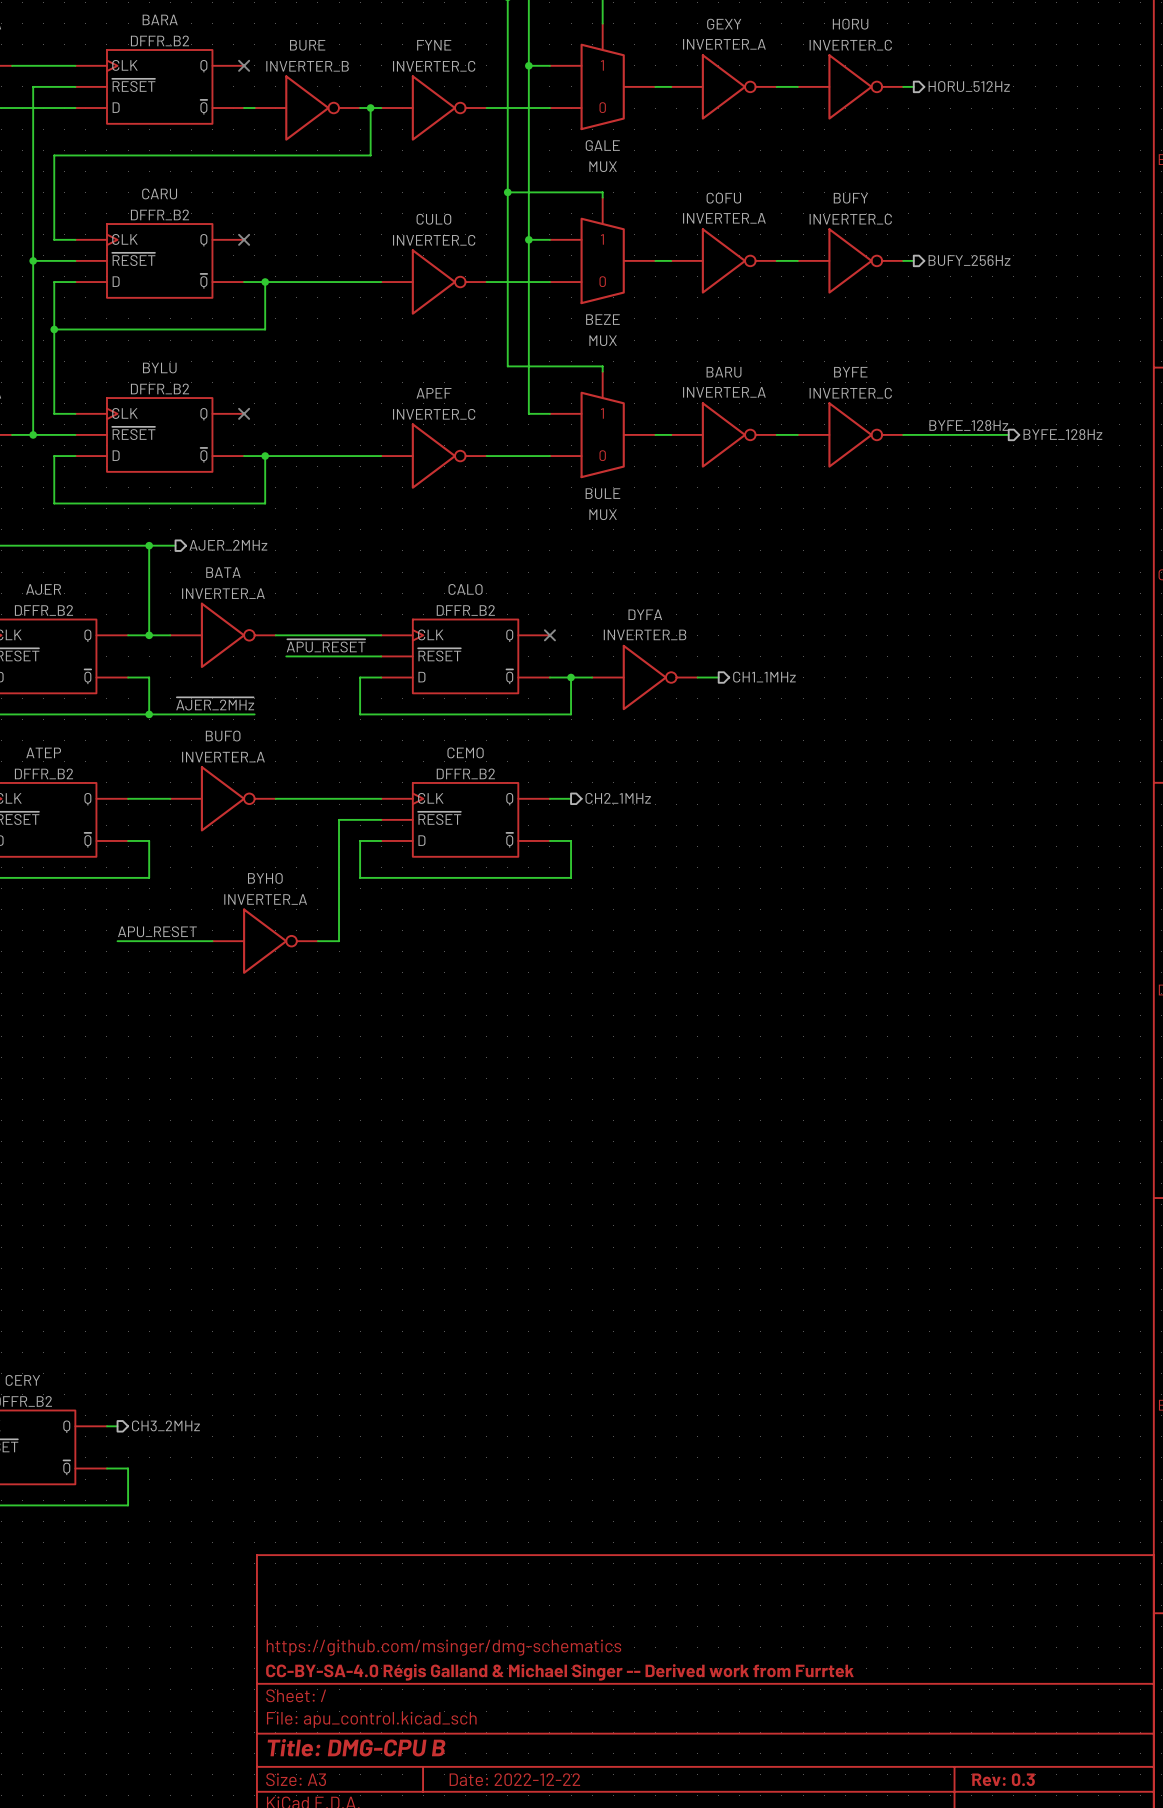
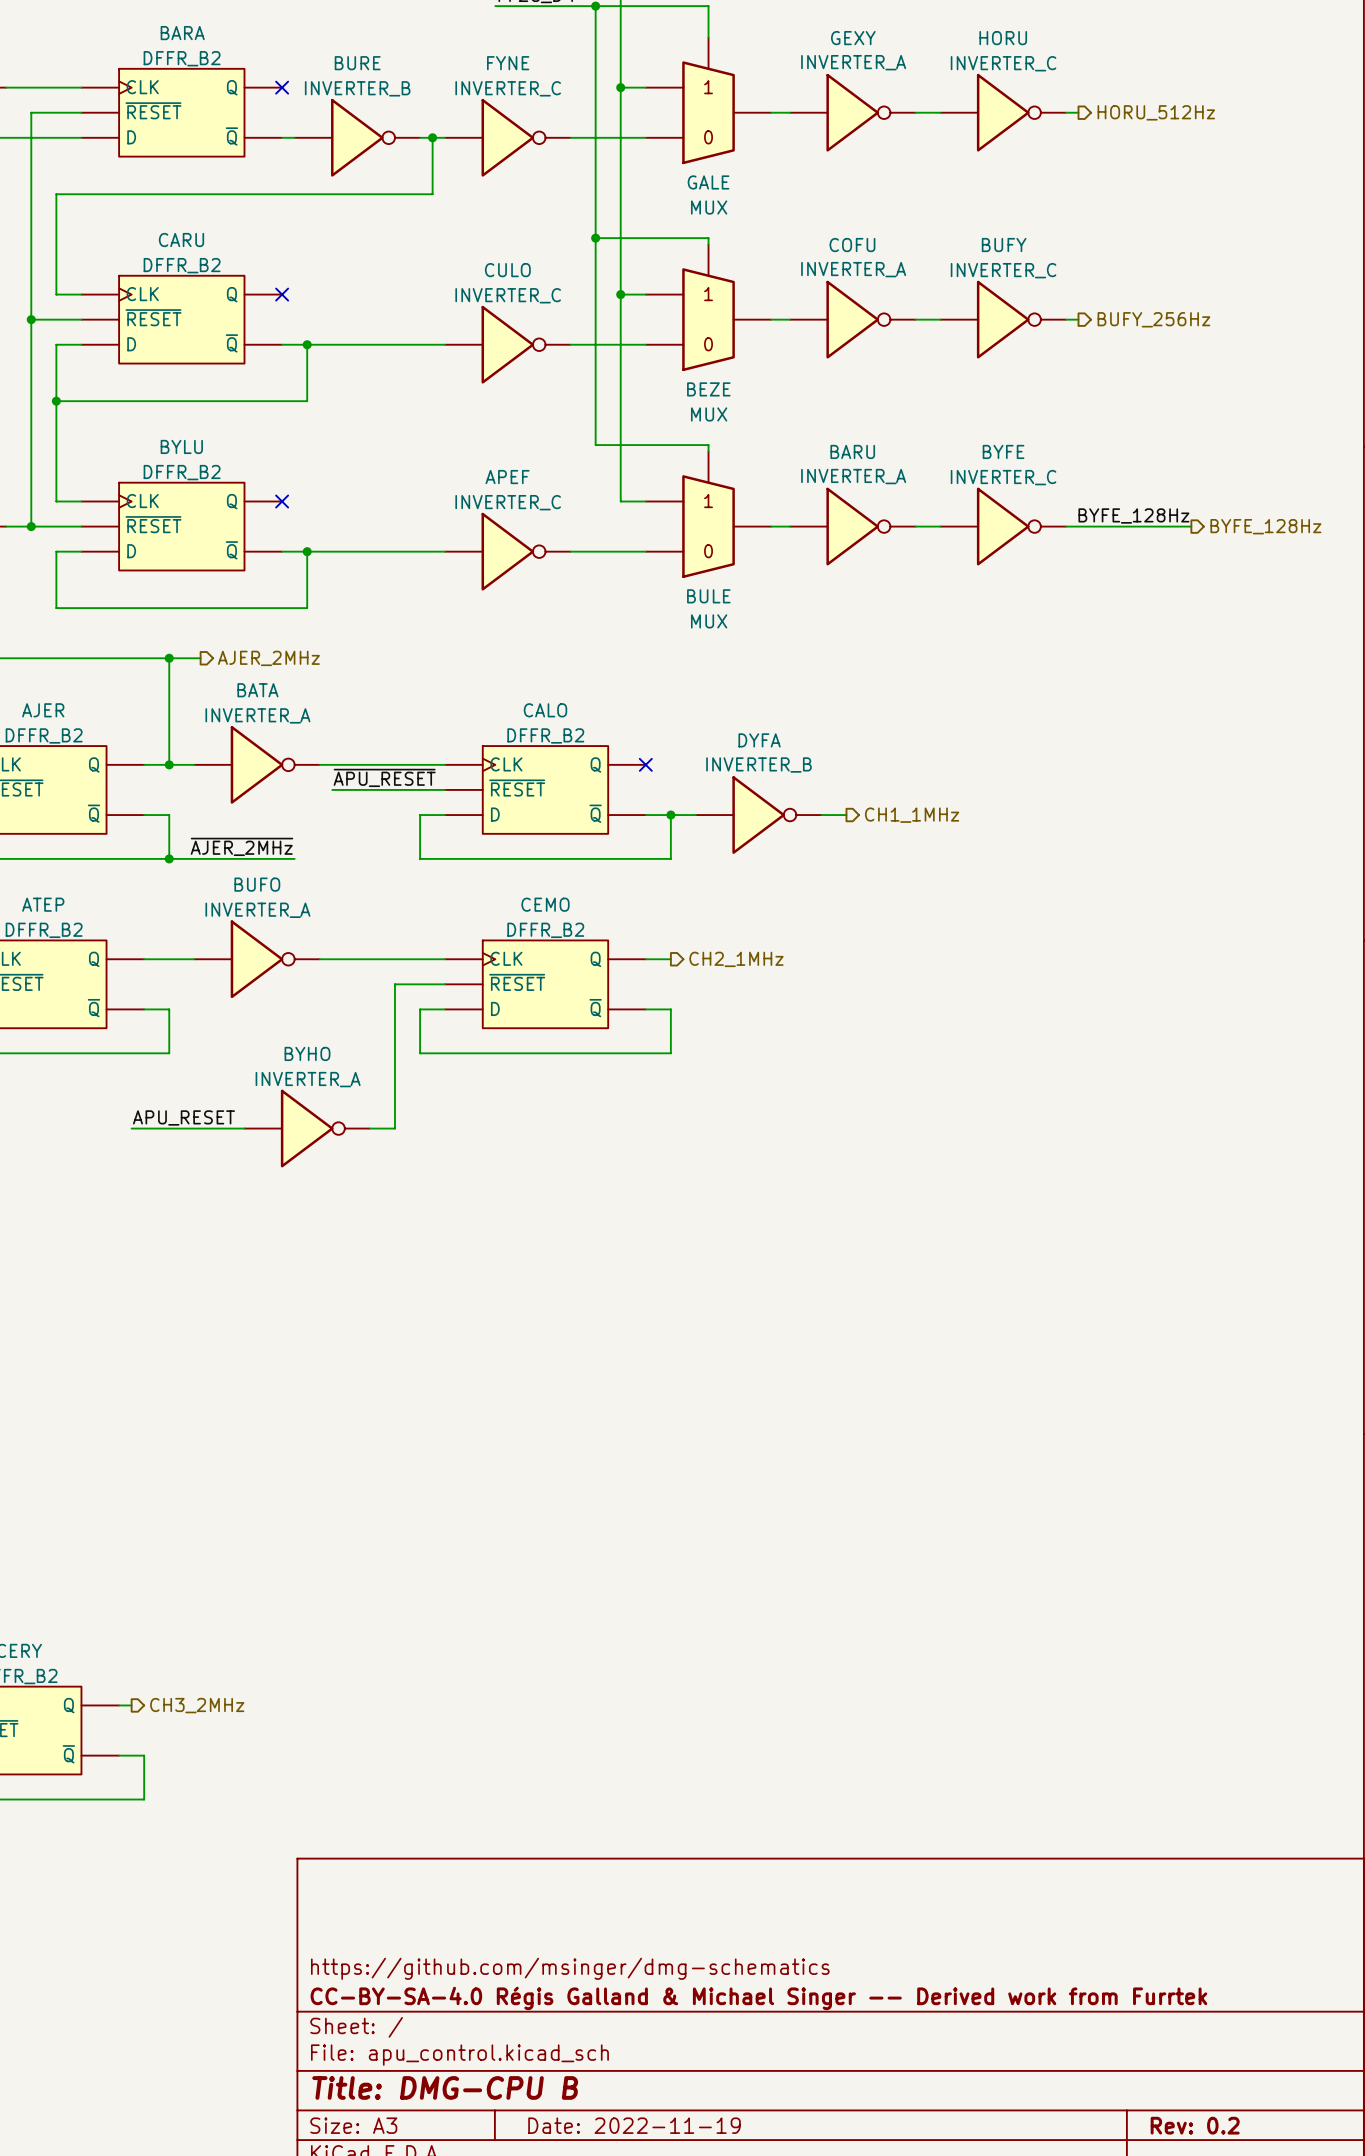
title block: Date: 2022-12-22 (514, 1779) -> Date: 2022-11-19 (634, 2125)
title block: Rev: 0.3 (1003, 1779) -> Rev: 0.2 (1195, 2125)

